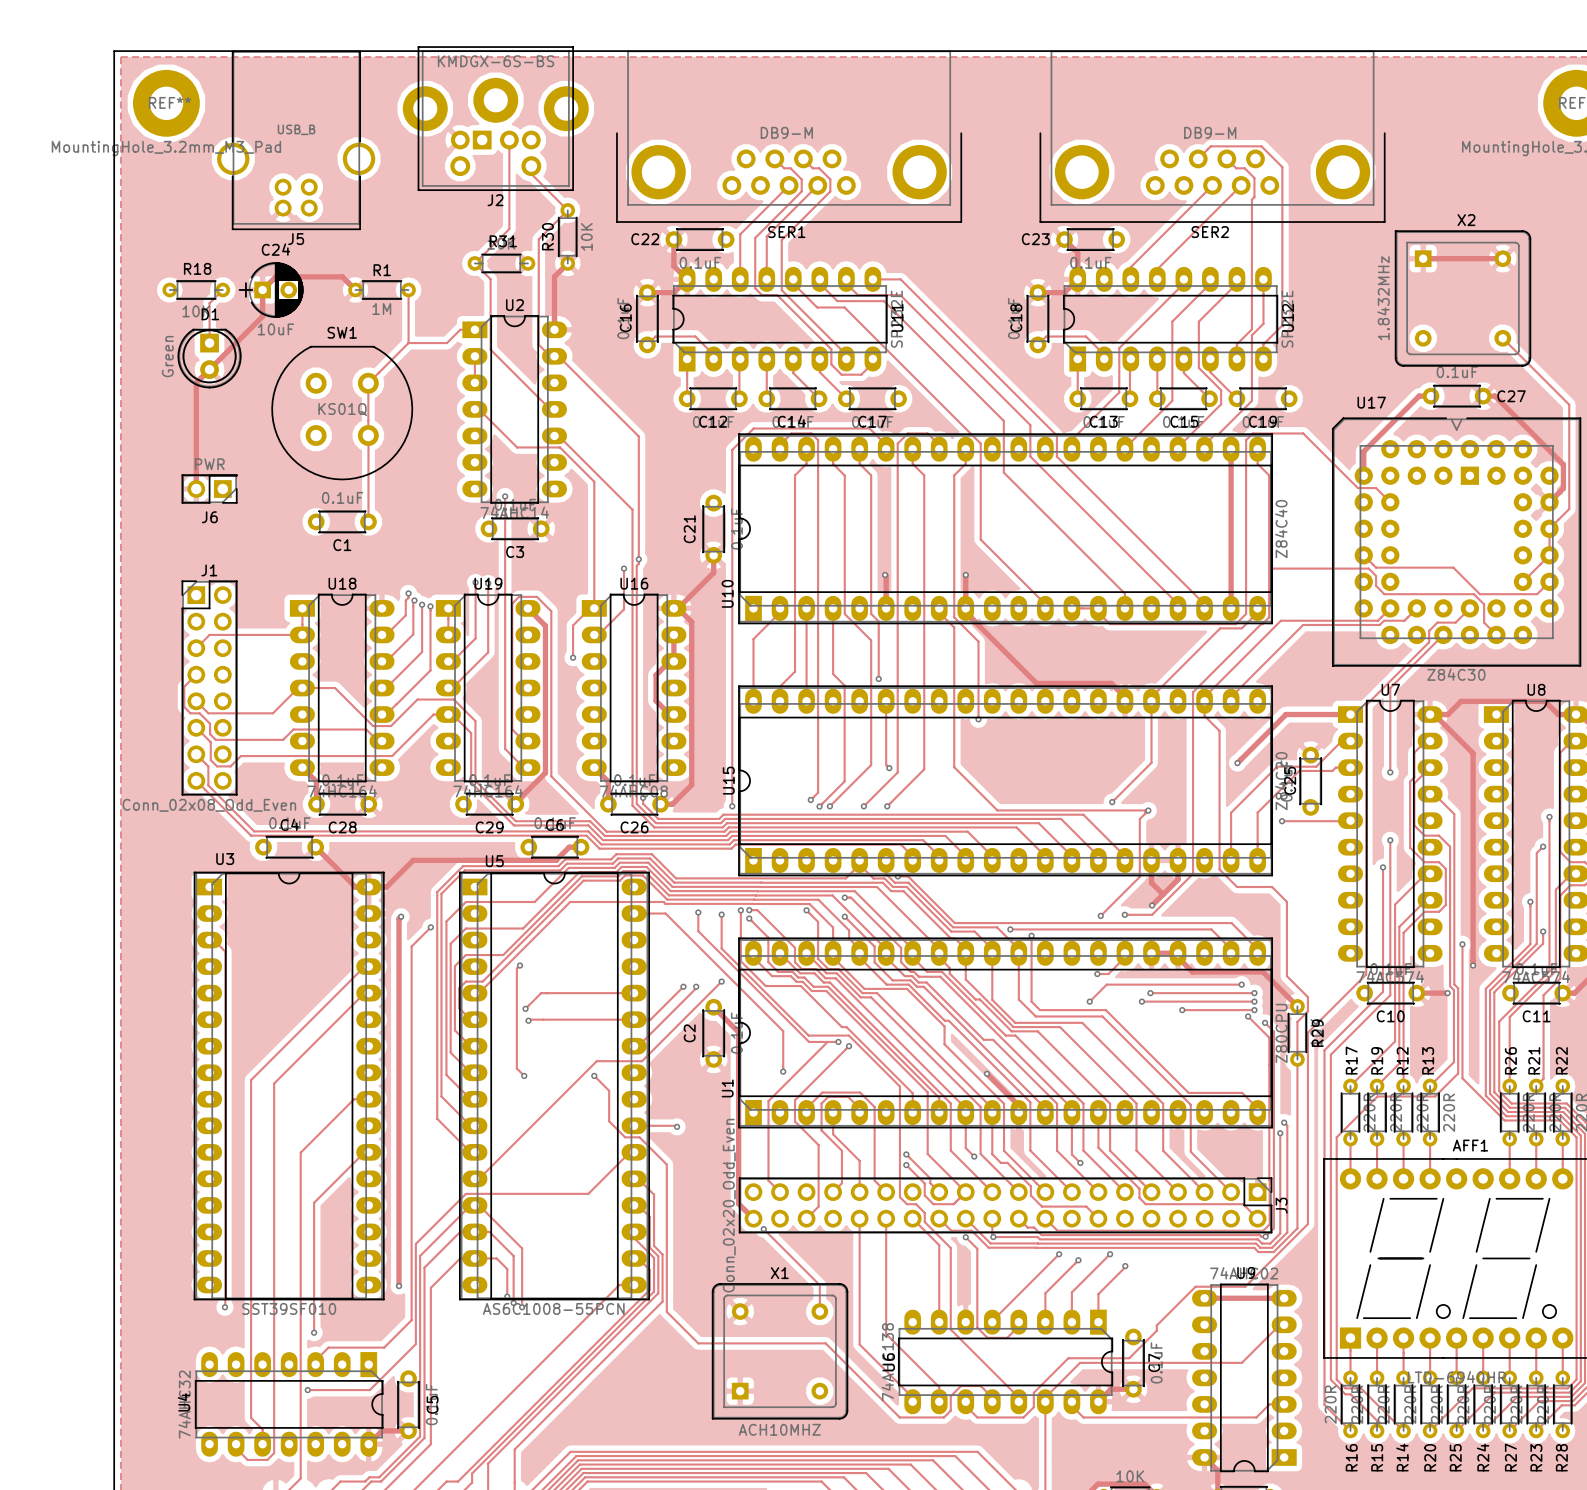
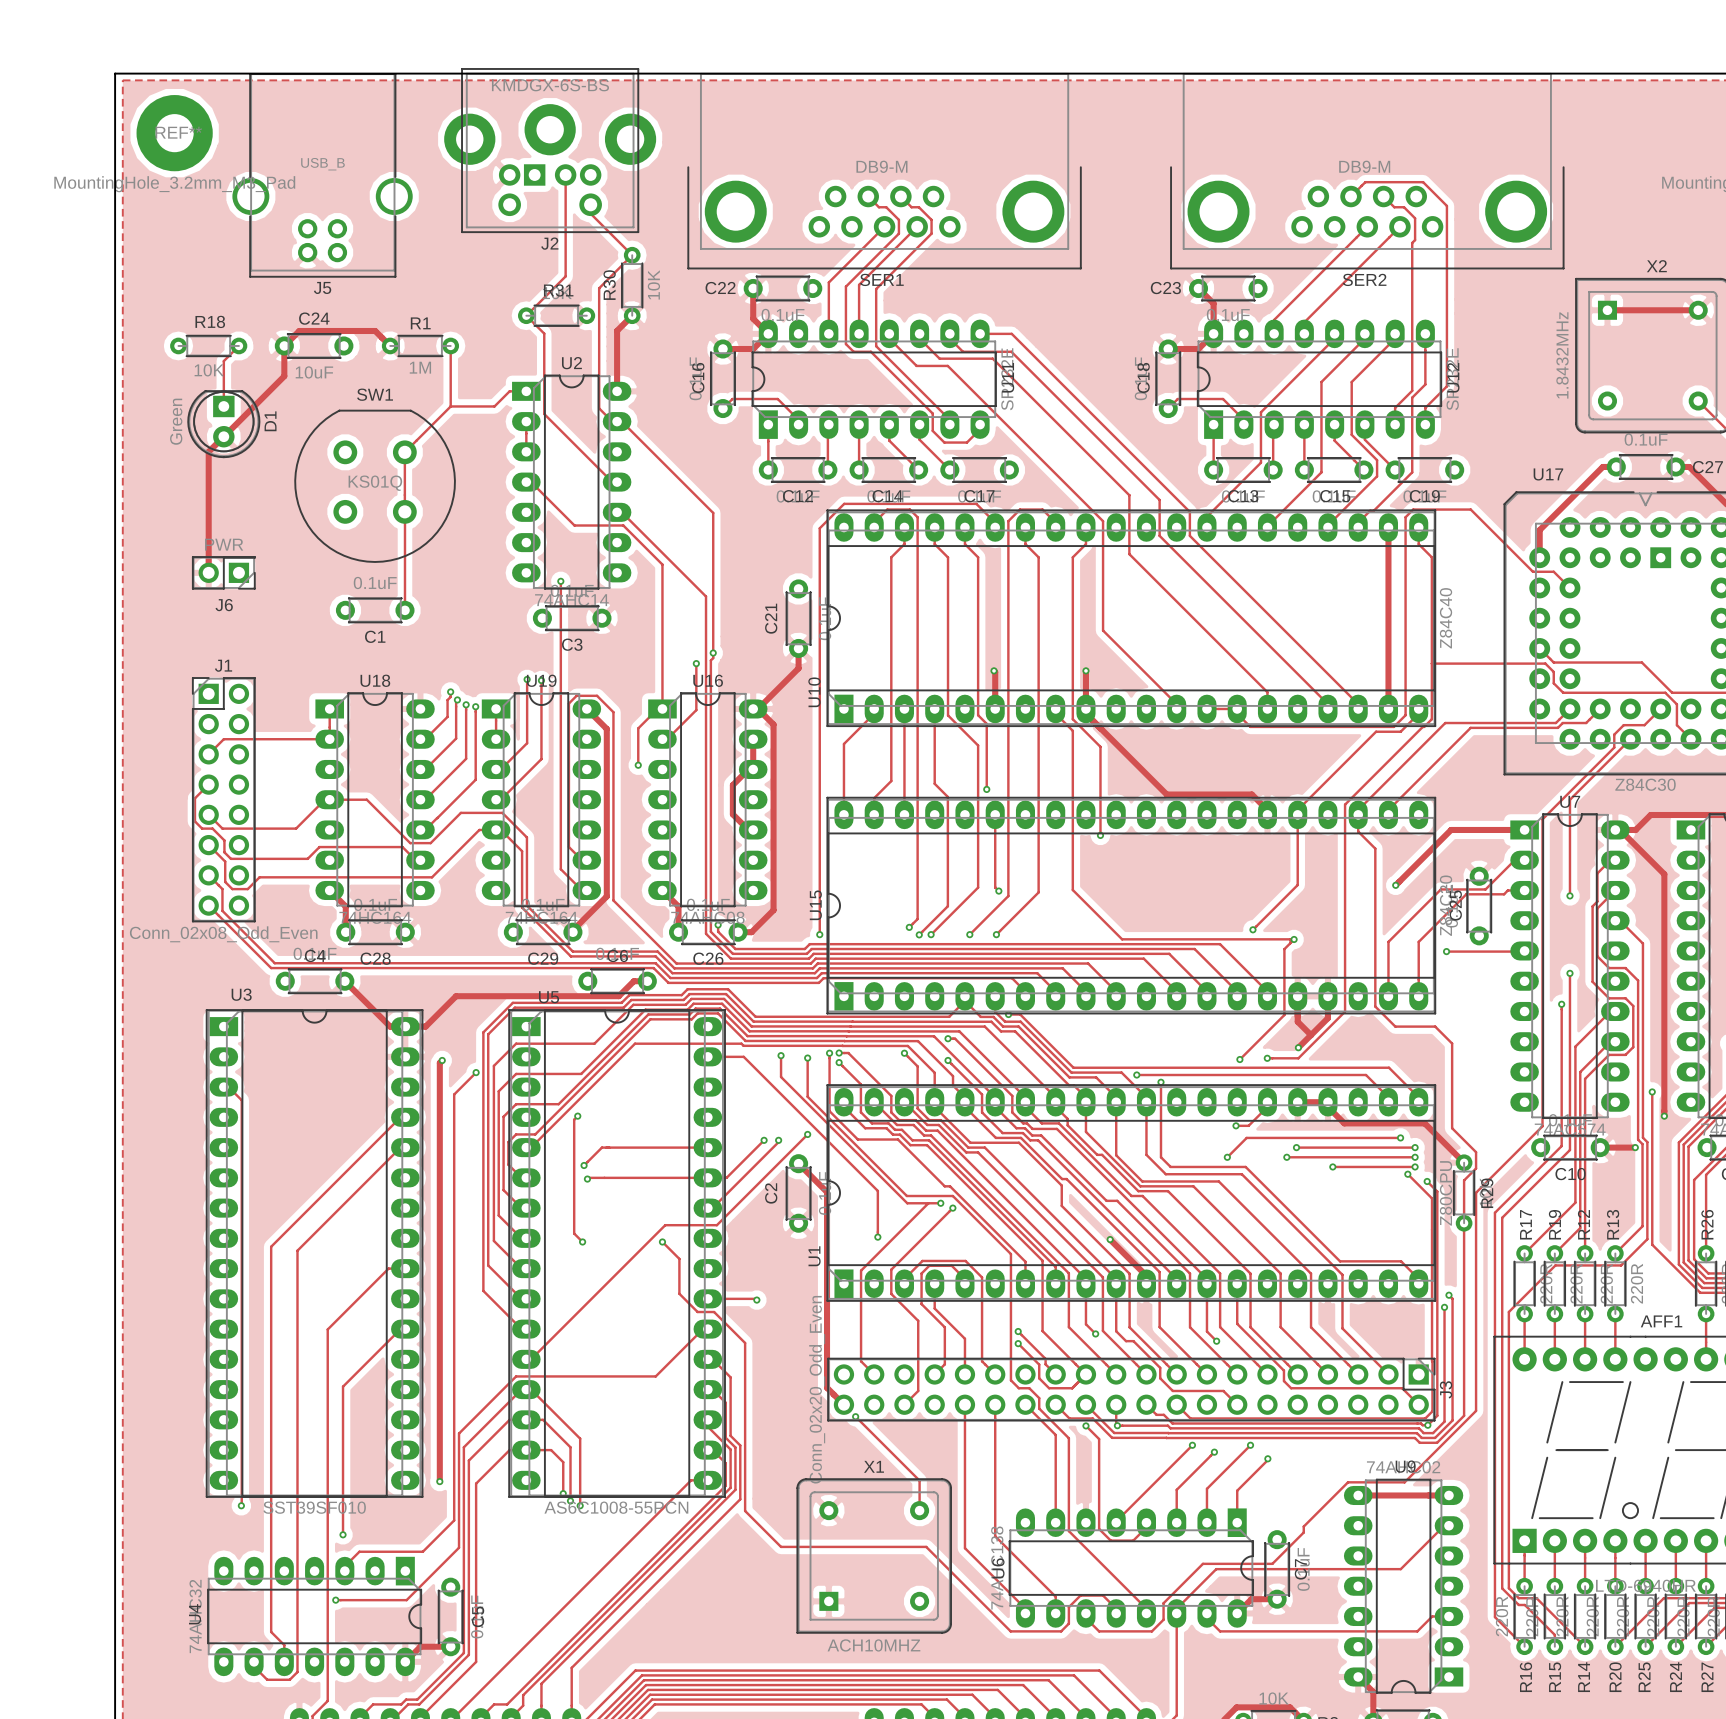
C24 footprint: [239, 262, 304, 318] -> [274, 333, 354, 359]
D1 name rotation: 0° (210, 314) -> 90° counterclockwise (270, 421)
D1 name position: D1 (210, 314) -> D1 (270, 421)

